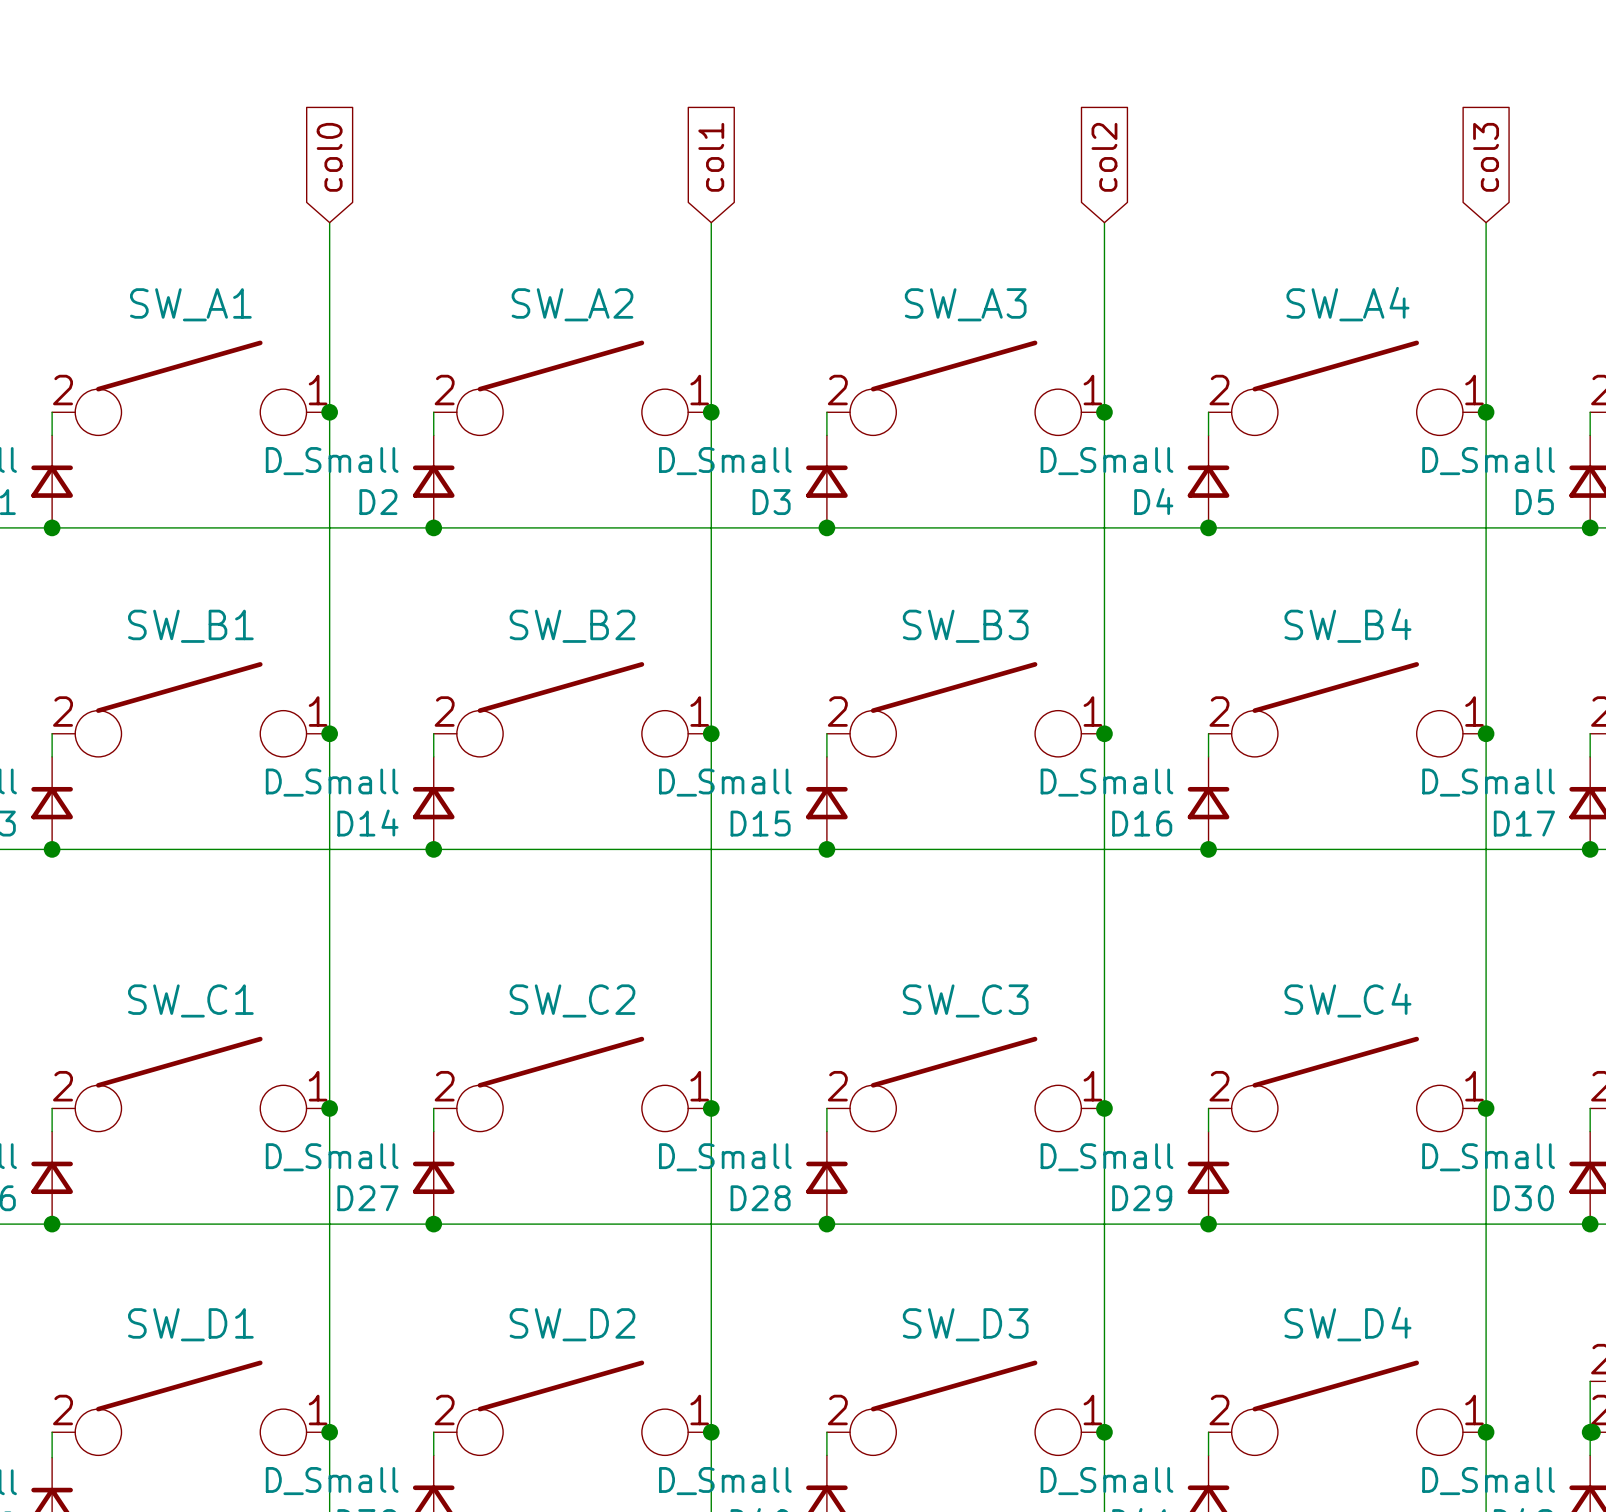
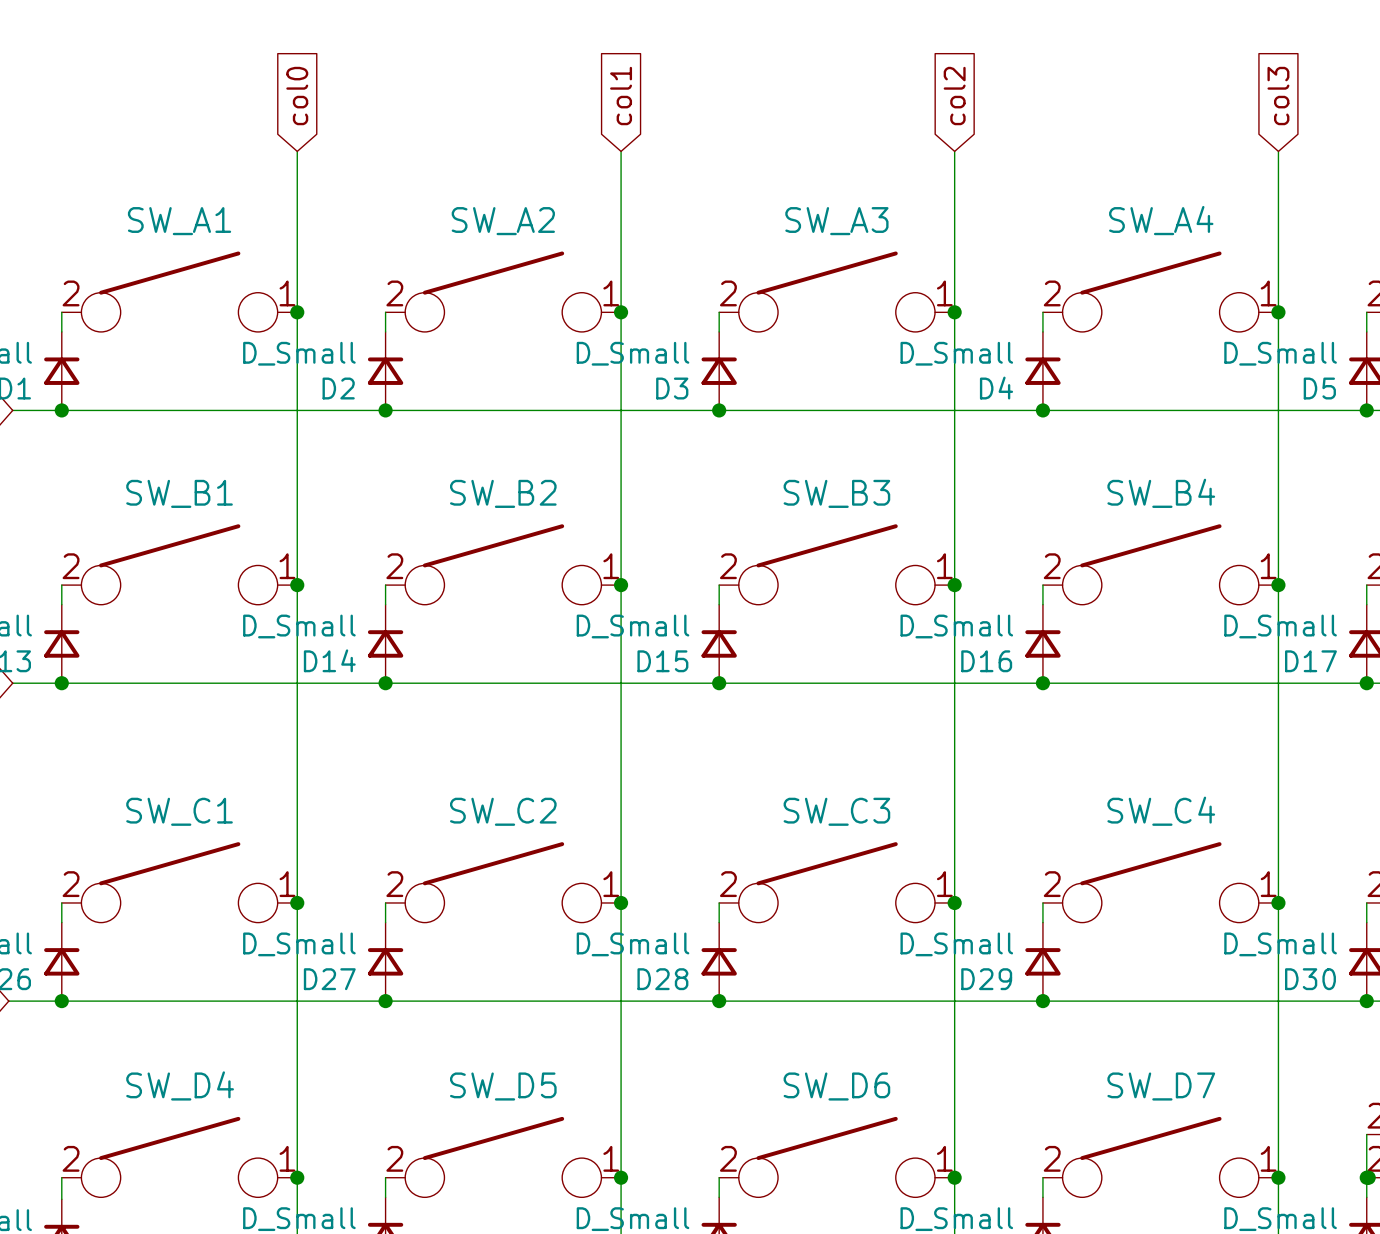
SW_D1 name: SW_D1 (190, 1324) -> SW_D4 (180, 1085)
SW_D2 name: SW_D2 (572, 1324) -> SW_D5 (503, 1086)
SW_D3 name: SW_D3 (965, 1324) -> SW_D6 (836, 1086)
SW_D4 name: SW_D4 (1347, 1324) -> SW_D7 (1161, 1086)

